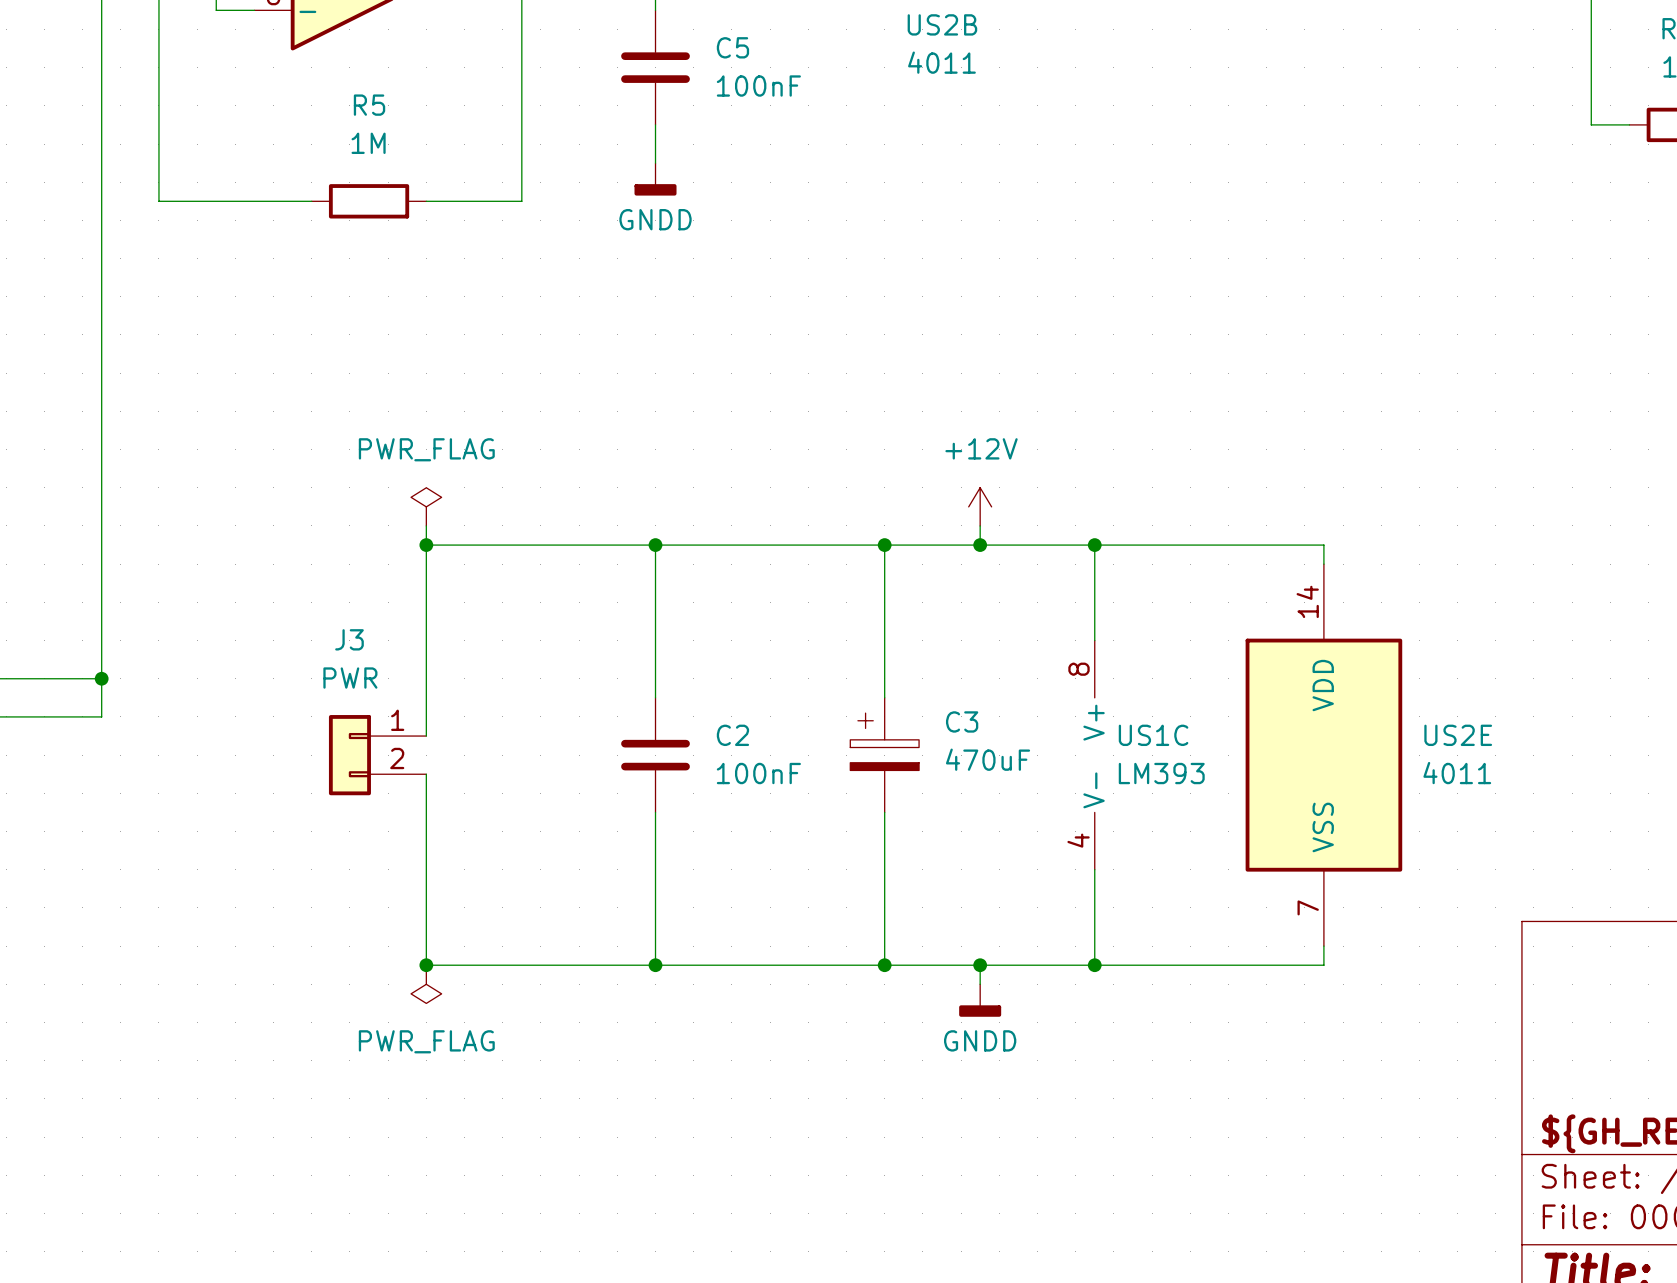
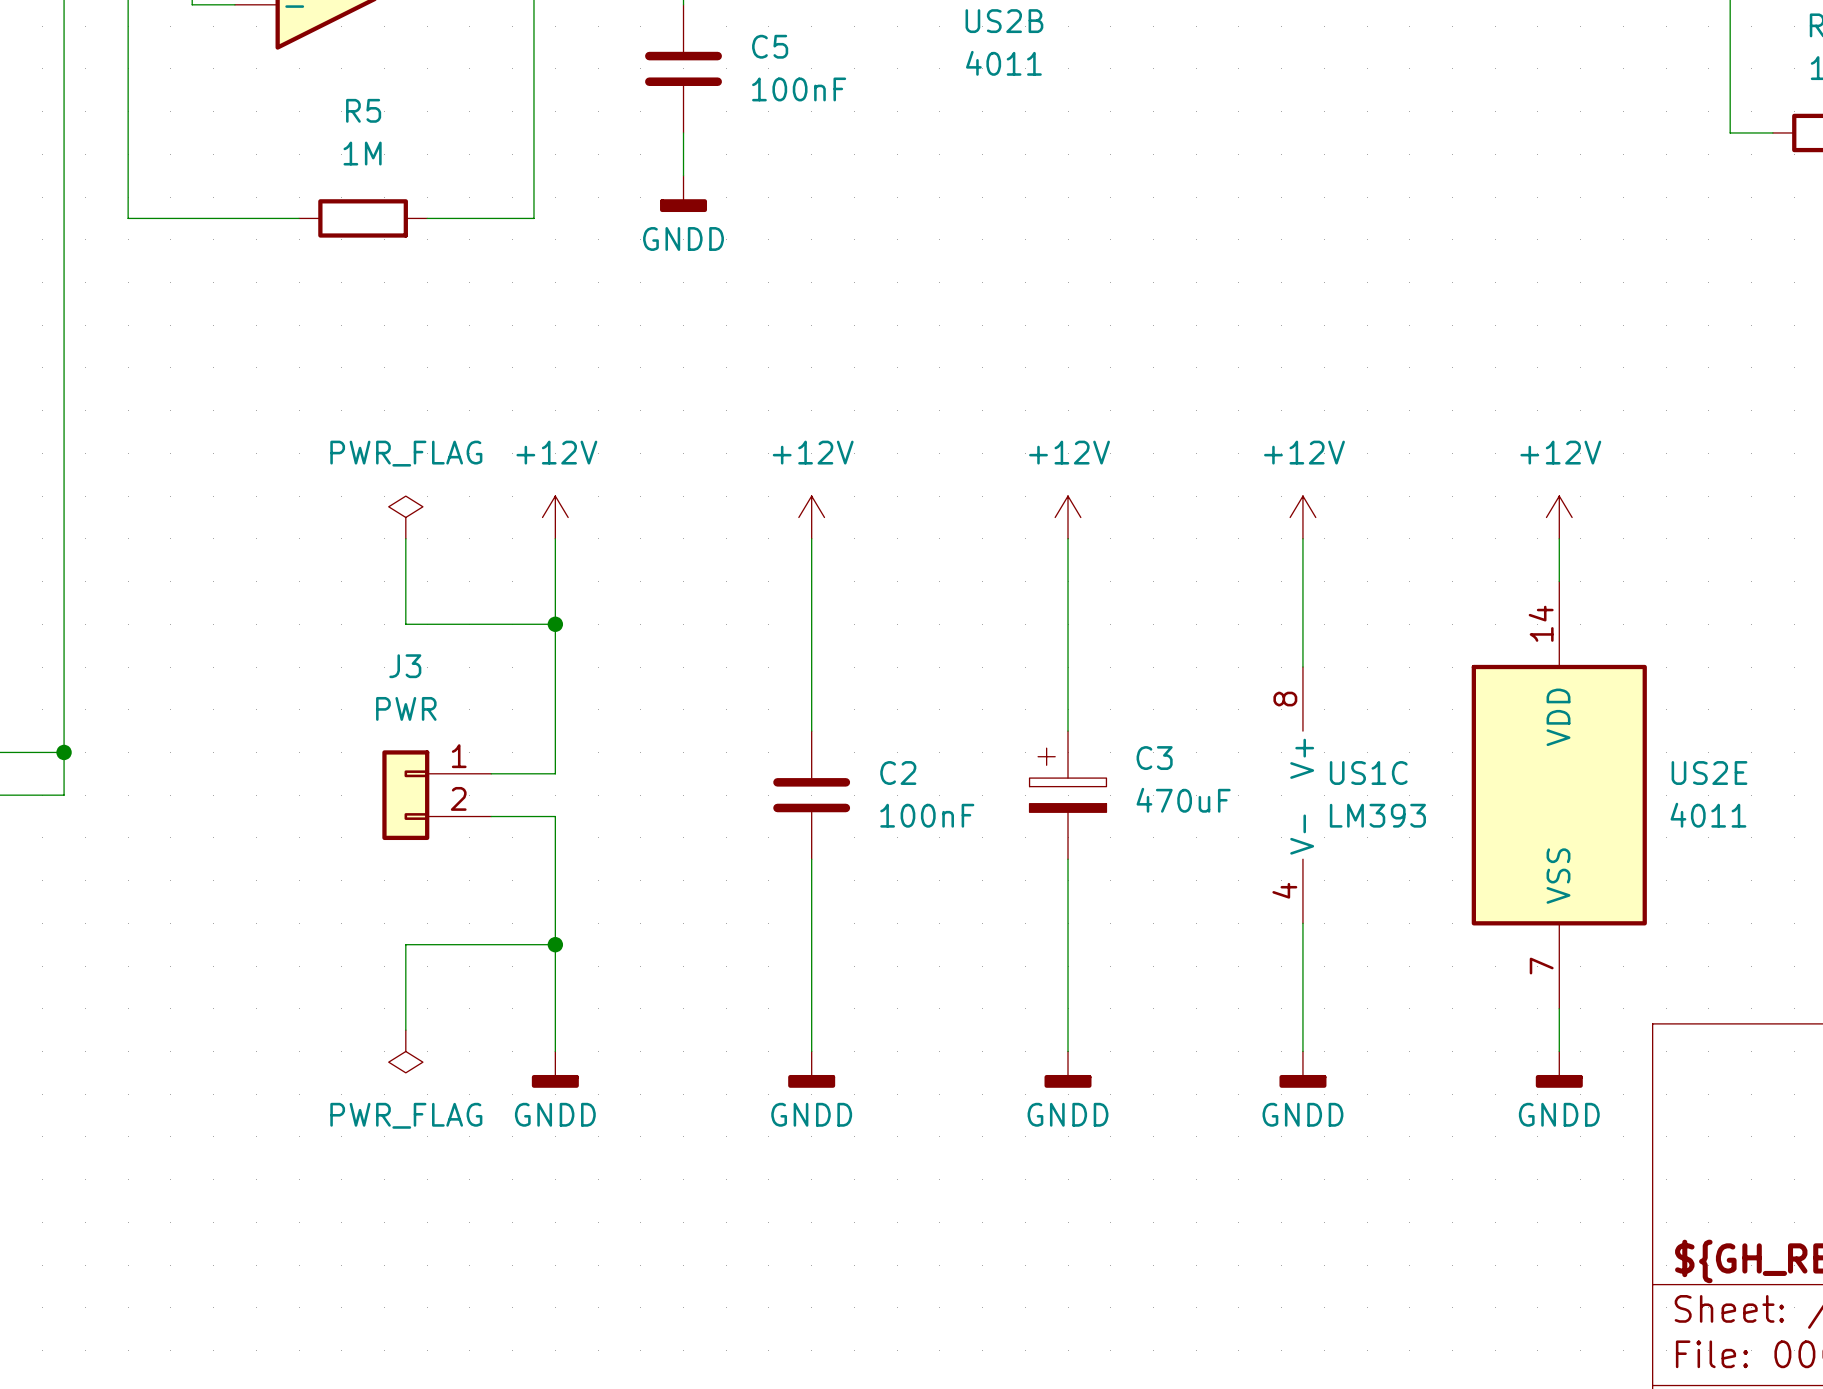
power symbol: none -> +12V (555, 517)
power symbol: none -> +12V (811, 517)
power symbol: none -> +12V (1302, 517)
power symbol: none -> +12V (1559, 517)
wire: none -> (405, 538) (405, 624) (555, 624)
wire: none -> (555, 538) (555, 773) (491, 773)
wire: none -> (811, 538) (811, 731)
wire: none -> (1068, 538) (1068, 731)
wire: none -> (1302, 538) (1302, 667)
wire: none -> (1559, 538) (1559, 581)
power symbol position: PWR_FLAG (426, 506) -> PWR_FLAG (405, 517)
power symbol position: +12V (980, 506) -> +12V (1068, 517)
wire: (426, 525) (426, 736) -> none
wire: (980, 525) (980, 545) -> none
wire: (426, 545) (1323, 545) (1323, 564) -> none
junction: (426, 545) -> none
wire: (655, 545) (655, 697) -> none
junction: (655, 545) -> none
wire: (884, 545) (884, 697) -> none
junction: (884, 545) -> none
junction: (980, 545) -> none
wire: (1094, 545) (1094, 640) -> none
junction: (1094, 545) -> none
junction: none -> (555, 624)
wire: none -> (491, 816) (555, 816) (555, 1051)
J3 position: (377, 755) -> (436, 795)
C2 position: (655, 755) -> (811, 795)
C3 position: (884, 755) -> (1068, 795)
US1C position: (1094, 755) -> (1302, 795)
US2E position: (1323, 755) -> (1559, 795)
wire: (426, 774) (426, 965) (1323, 965) (1323, 946) -> none
wire: none -> (811, 859) (811, 1051)
wire: none -> (1068, 859) (1068, 1051)
wire: (655, 812) (655, 965) -> none
wire: (884, 812) (884, 965) -> none
wire: none -> (1302, 923) (1302, 1051)
wire: none -> (555, 944) (405, 944) (405, 1030)
junction: none -> (555, 944)
wire: (1094, 869) (1094, 965) -> none
wire: none -> (1559, 1008) (1559, 1051)
power symbol: none -> GNDD (555, 1069)
power symbol: none -> GNDD (811, 1069)
power symbol: none -> GNDD (1302, 1069)
power symbol: none -> GNDD (1559, 1069)
junction: (426, 965) -> none
junction: (655, 965) -> none
junction: (884, 965) -> none
junction: (980, 965) -> none
junction: (1094, 965) -> none
power symbol position: PWR_FLAG (426, 984) -> PWR_FLAG (405, 1051)
power symbol position: GNDD (980, 1000) -> GNDD (1068, 1069)

